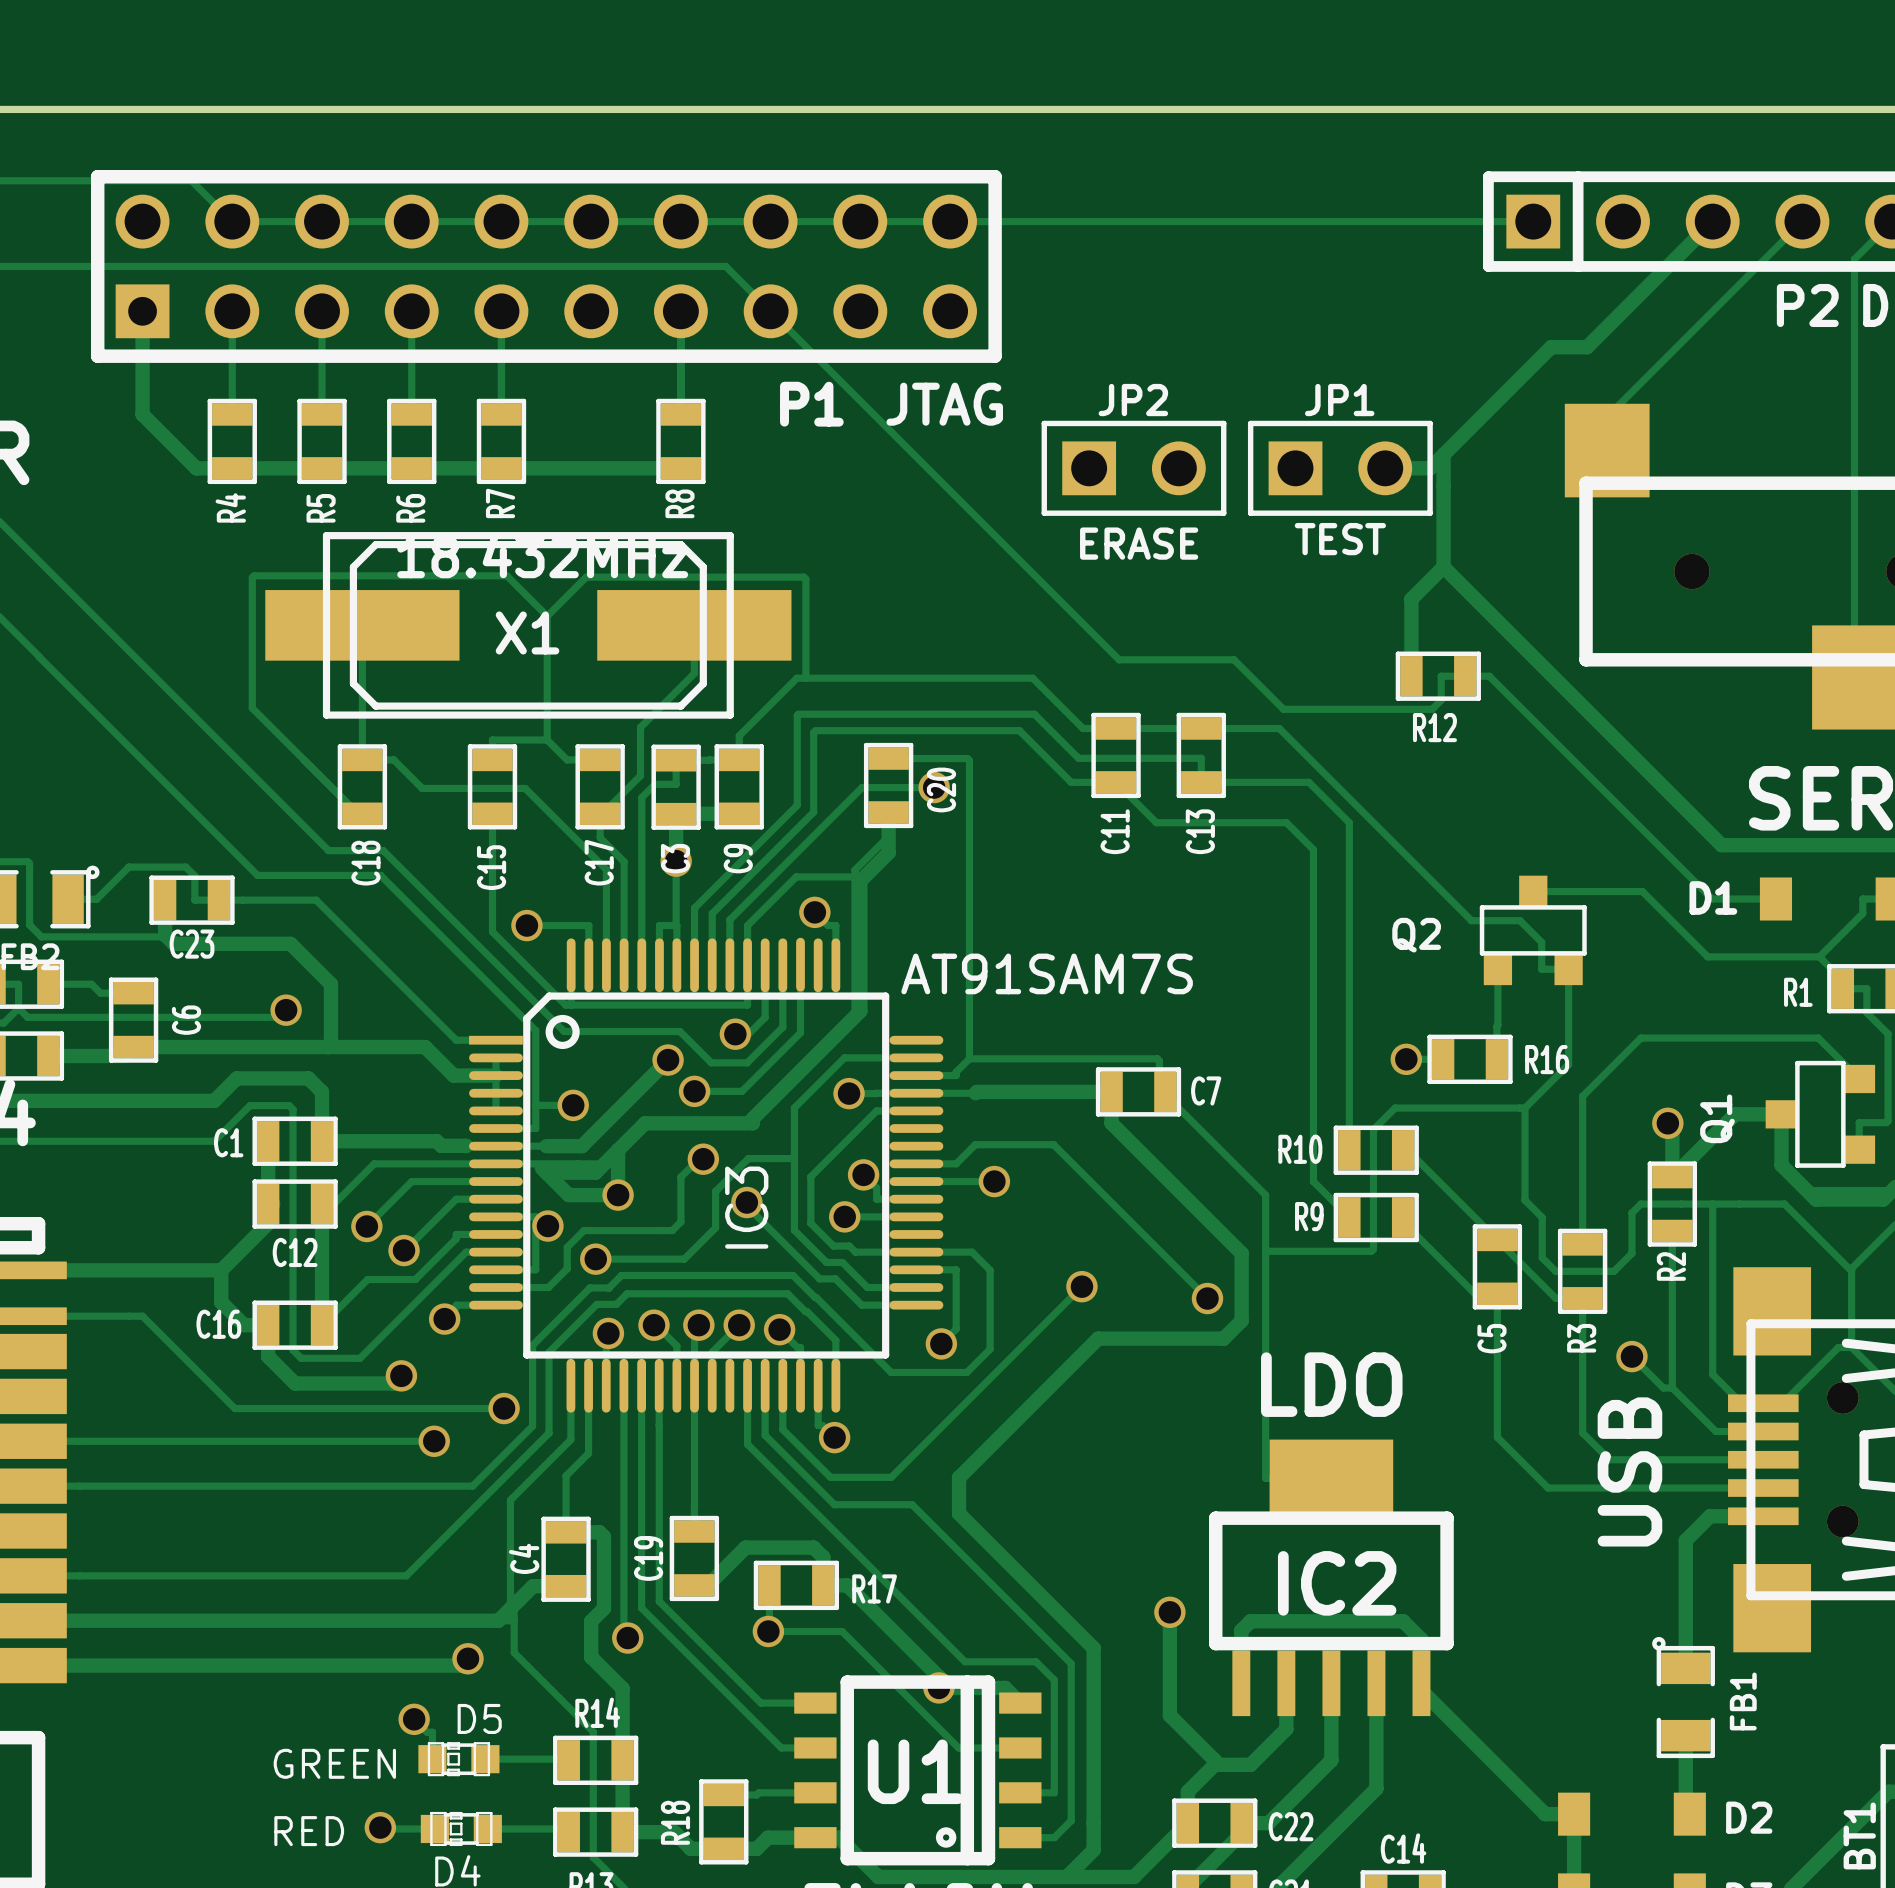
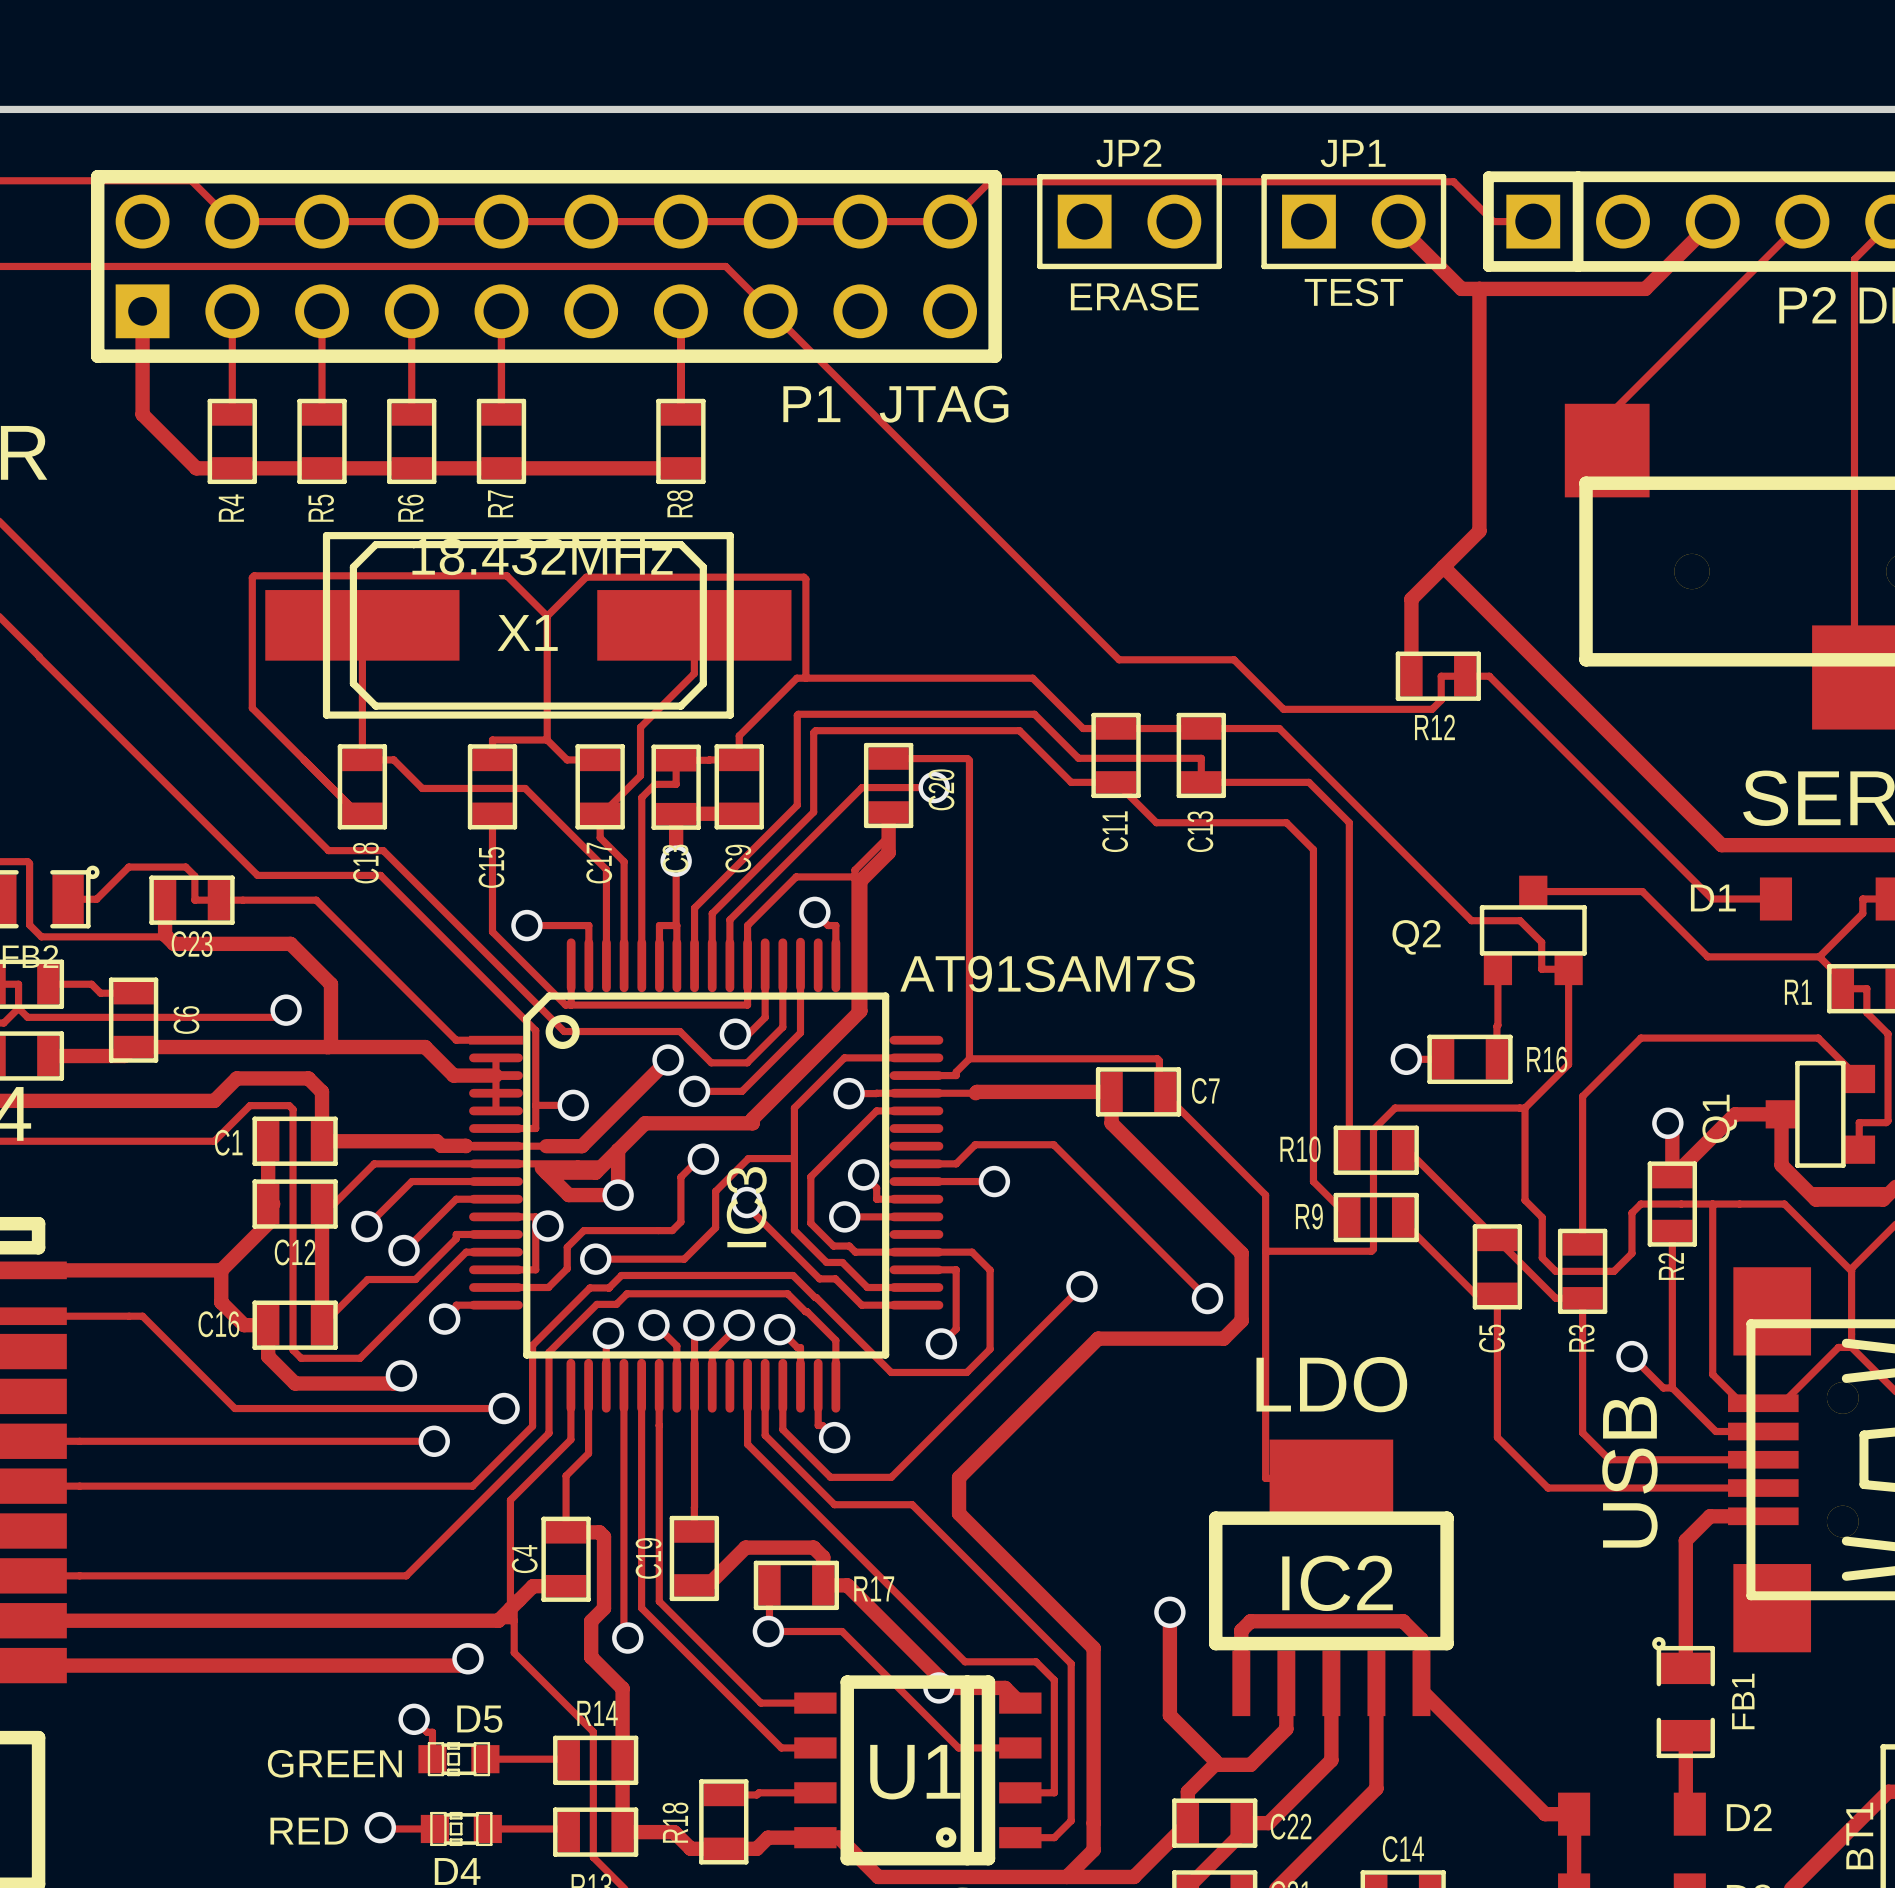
track: (950, 221) (1493, 221) -> (950, 221) (989, 181) (1453, 181) (1493, 221)
track: (1645, 288) (1587, 347) (1551, 347) (1430, 468) (1385, 468) -> (1645, 288) (1461, 288) (1398, 226) (1398, 221)
track: (1443, 454) (1443, 567) -> (1479, 288) (1479, 531) (1443, 567)
JP2 position: (1134, 468) -> (1129, 221)
JP1 position: (1340, 468) -> (1353, 221)

